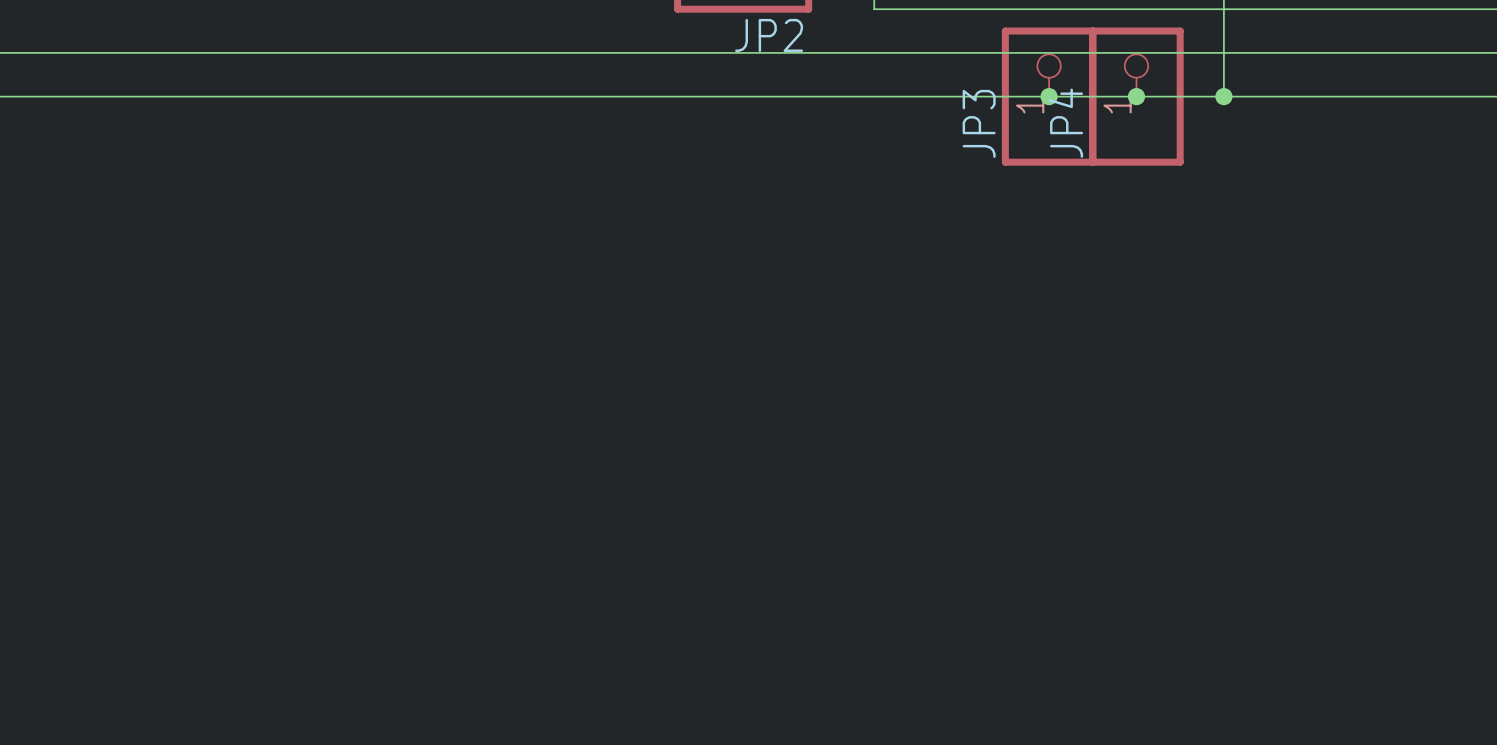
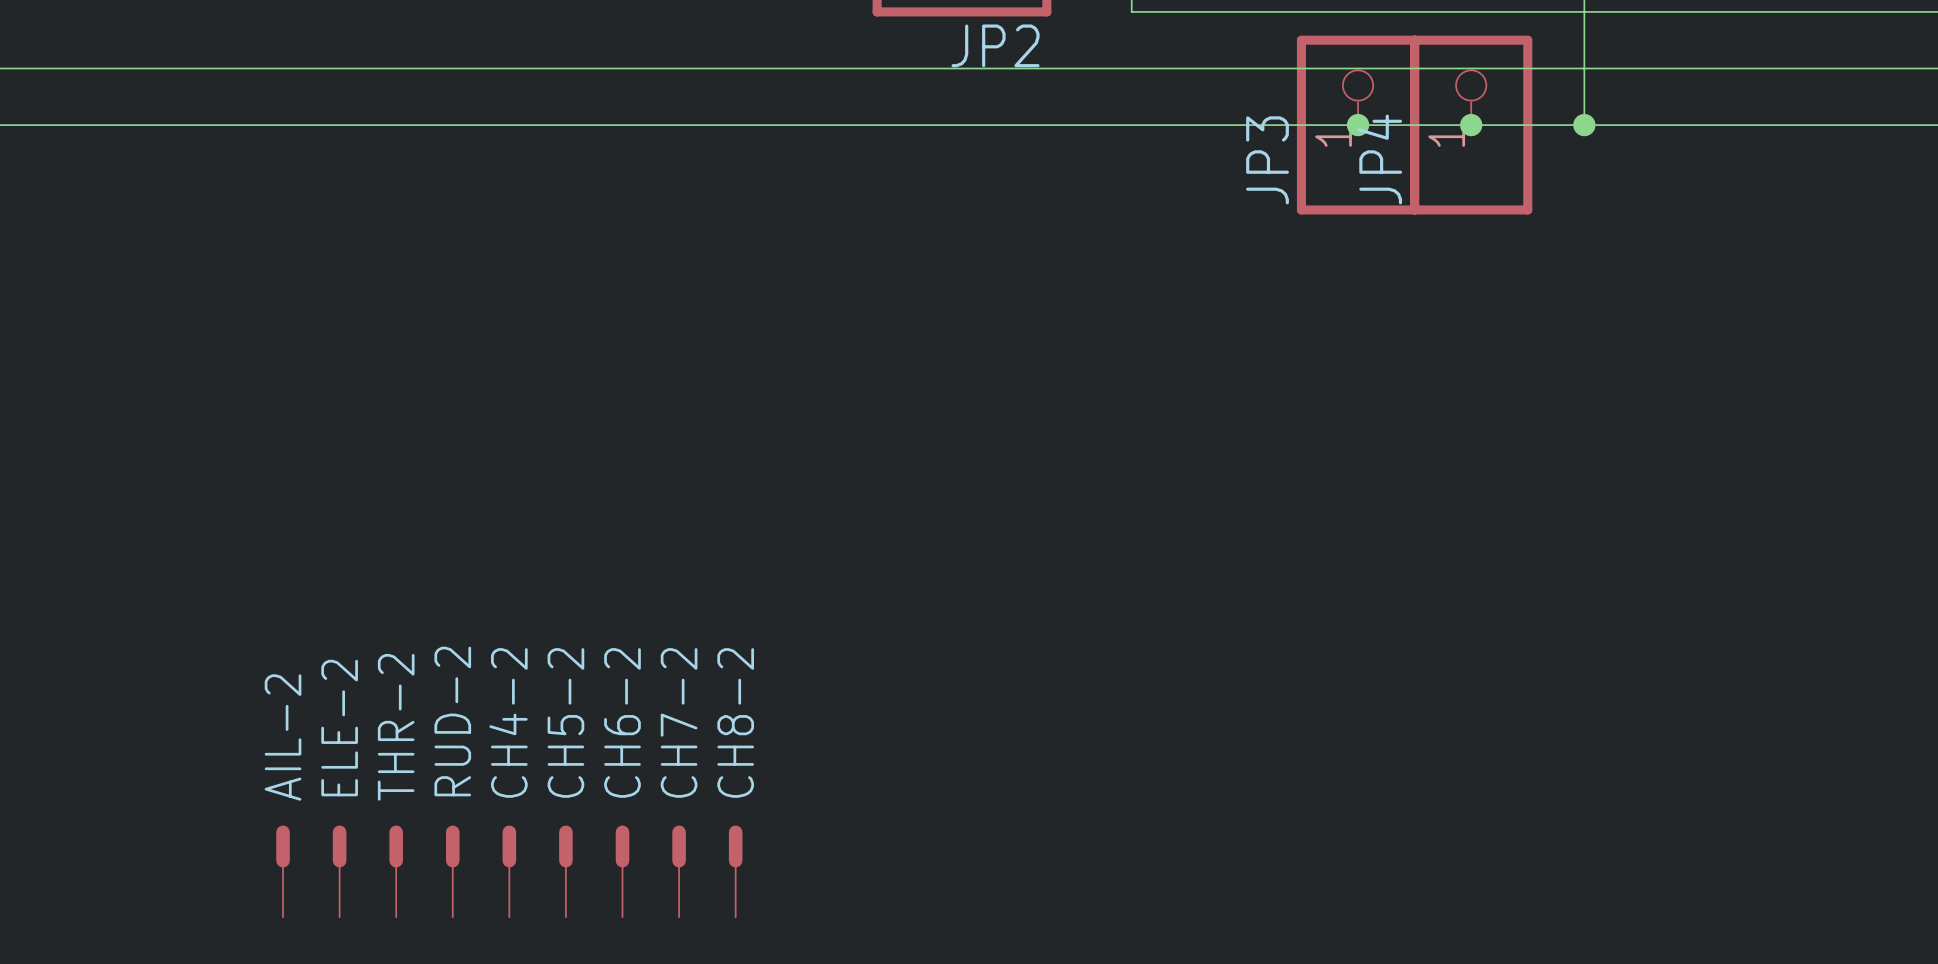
AIL-2: none -> (283, 871)
ELE-2: none -> (339, 871)
THR-2: none -> (396, 871)
RUD-2: none -> (452, 871)
CH4-2: none -> (509, 871)
CH5-2: none -> (565, 871)
CH6-2: none -> (622, 871)
CH7-2: none -> (679, 871)
CH8-2: none -> (735, 871)

